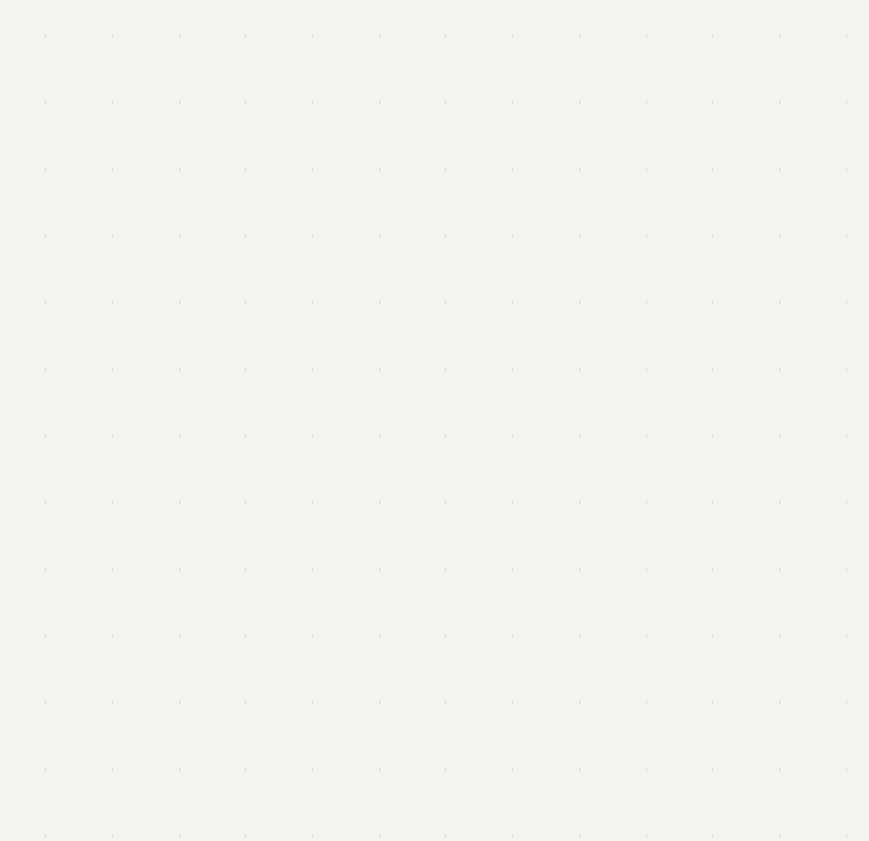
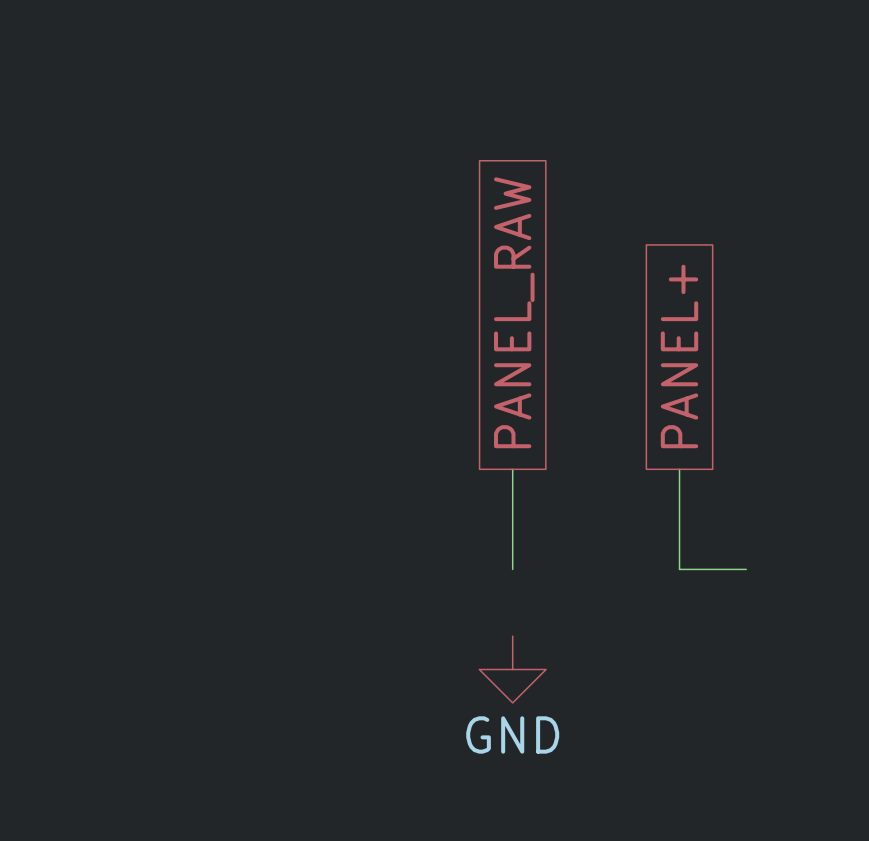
global label: none -> PANEL_RAW (514, 312)
global label: none -> PANEL+ (679, 356)
wire: none -> (512, 469) (512, 569)
wire: none -> (679, 469) (679, 569) (746, 569)
power symbol: none -> GND (512, 669)

